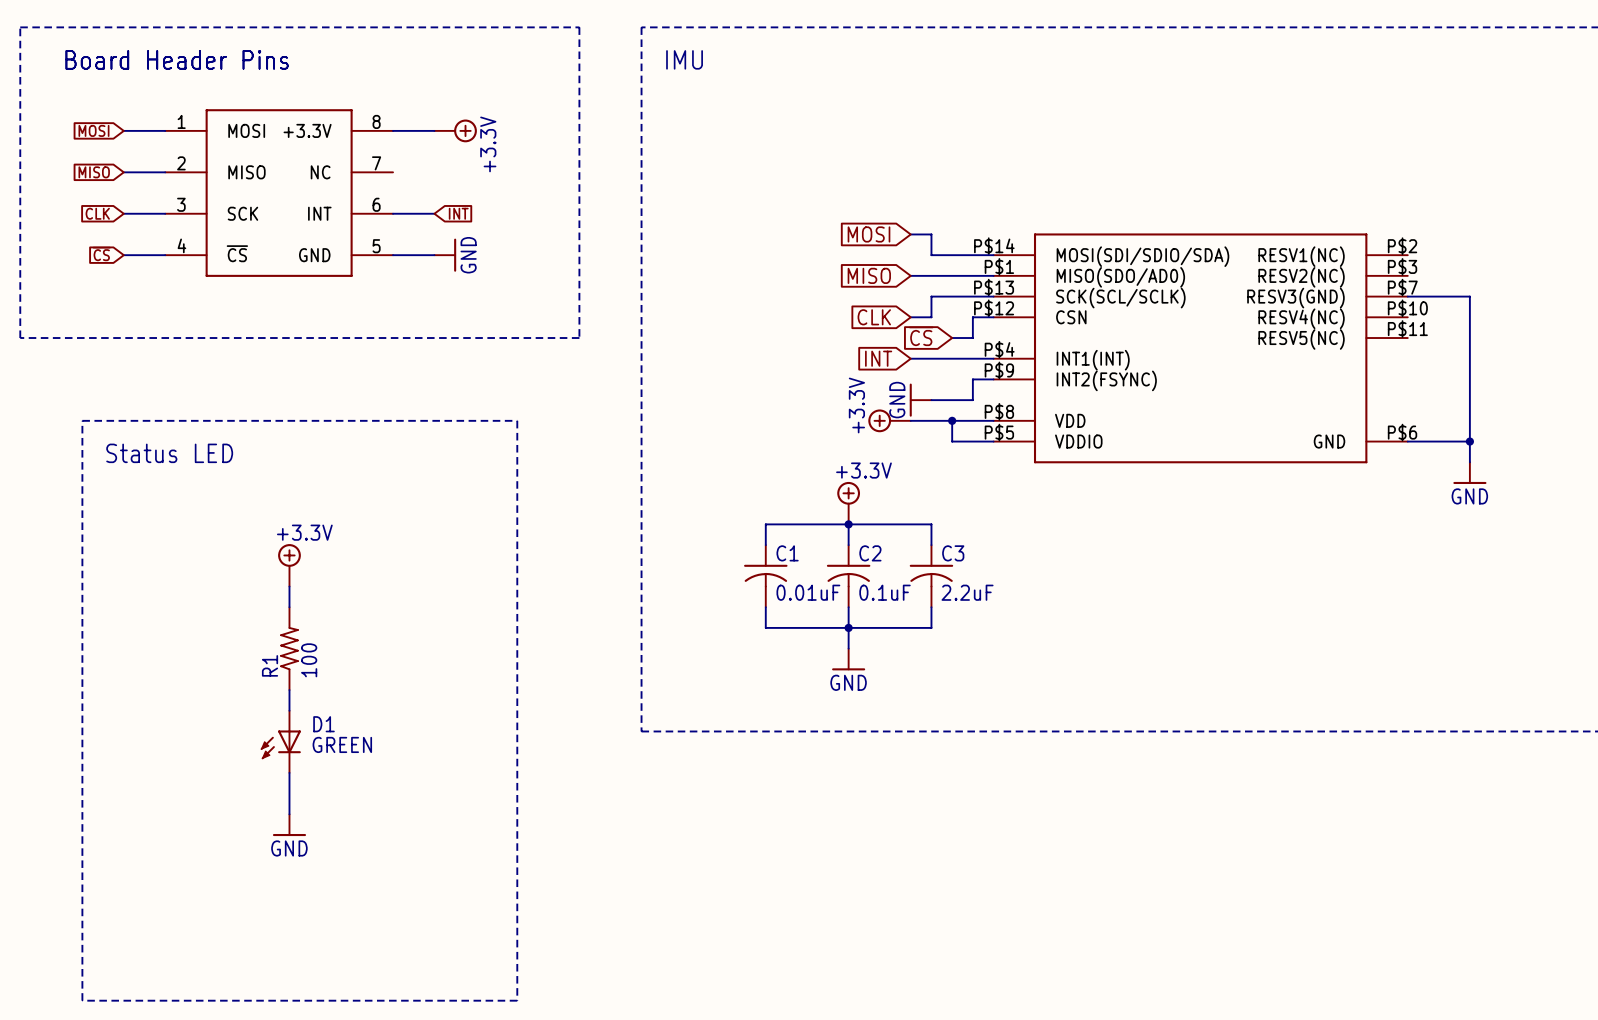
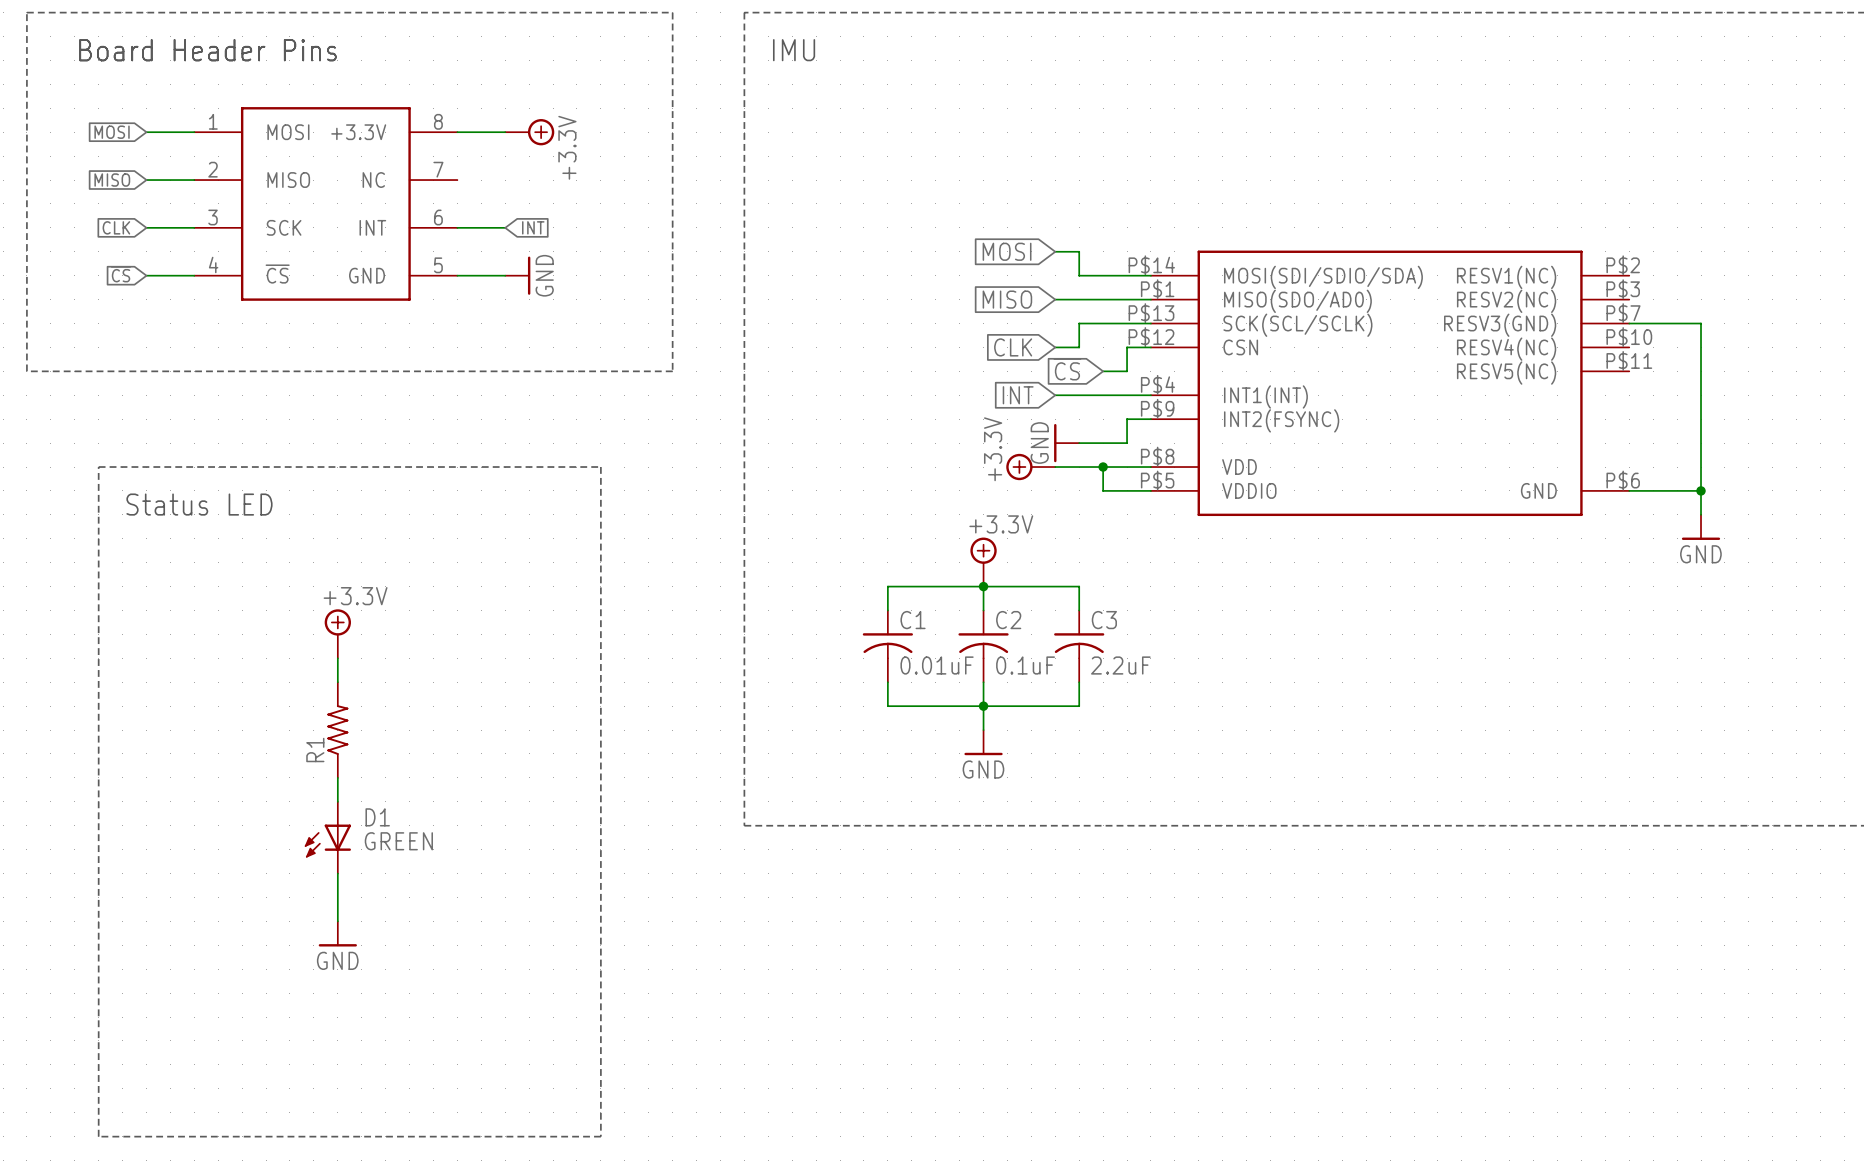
R1 value: 100 (309, 660) -> none

